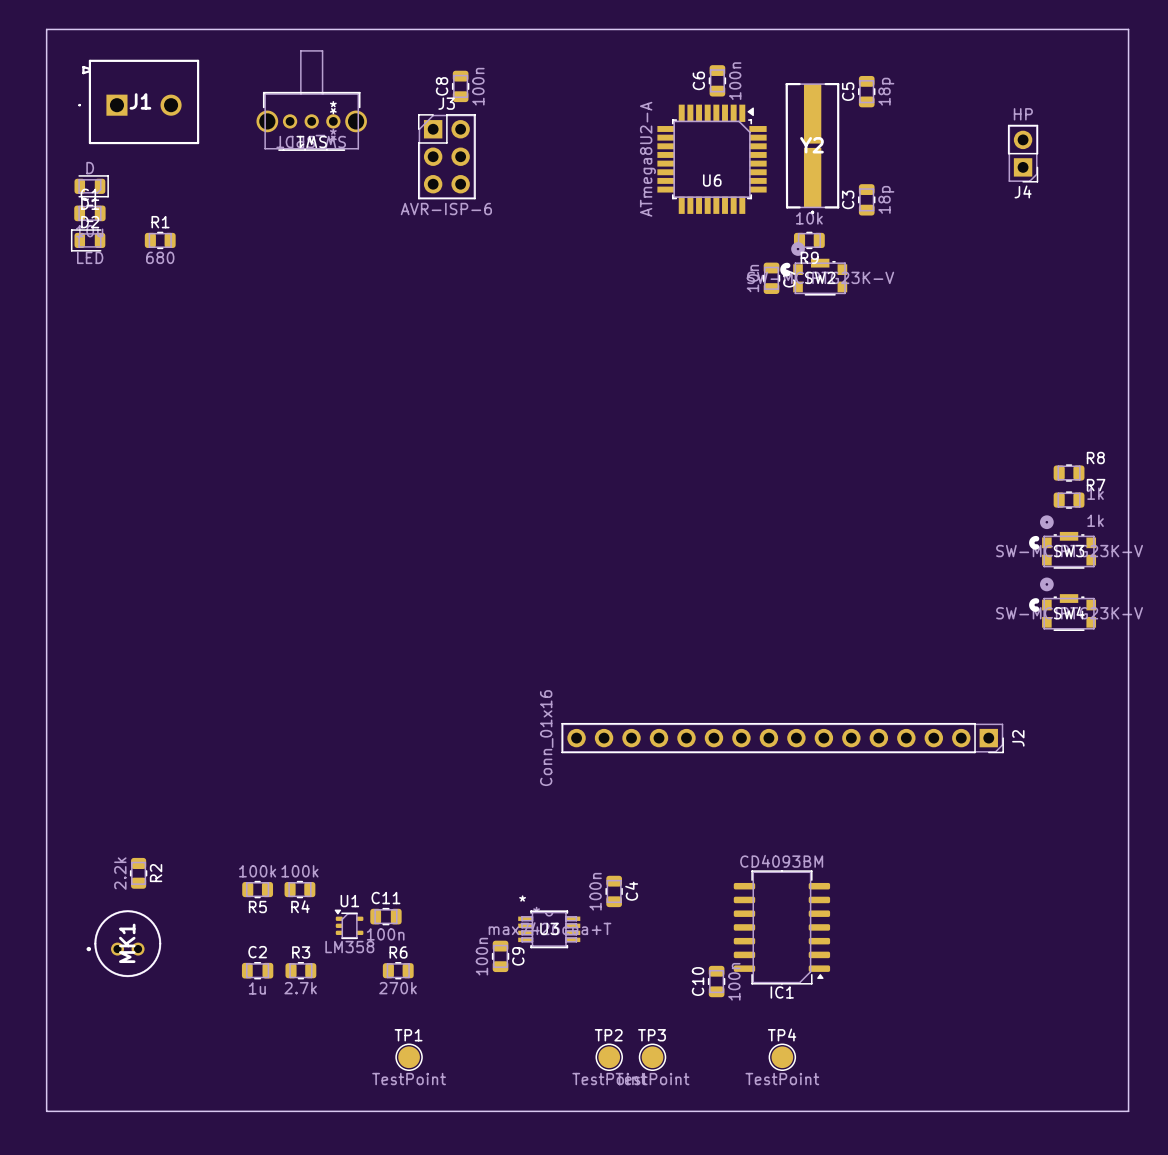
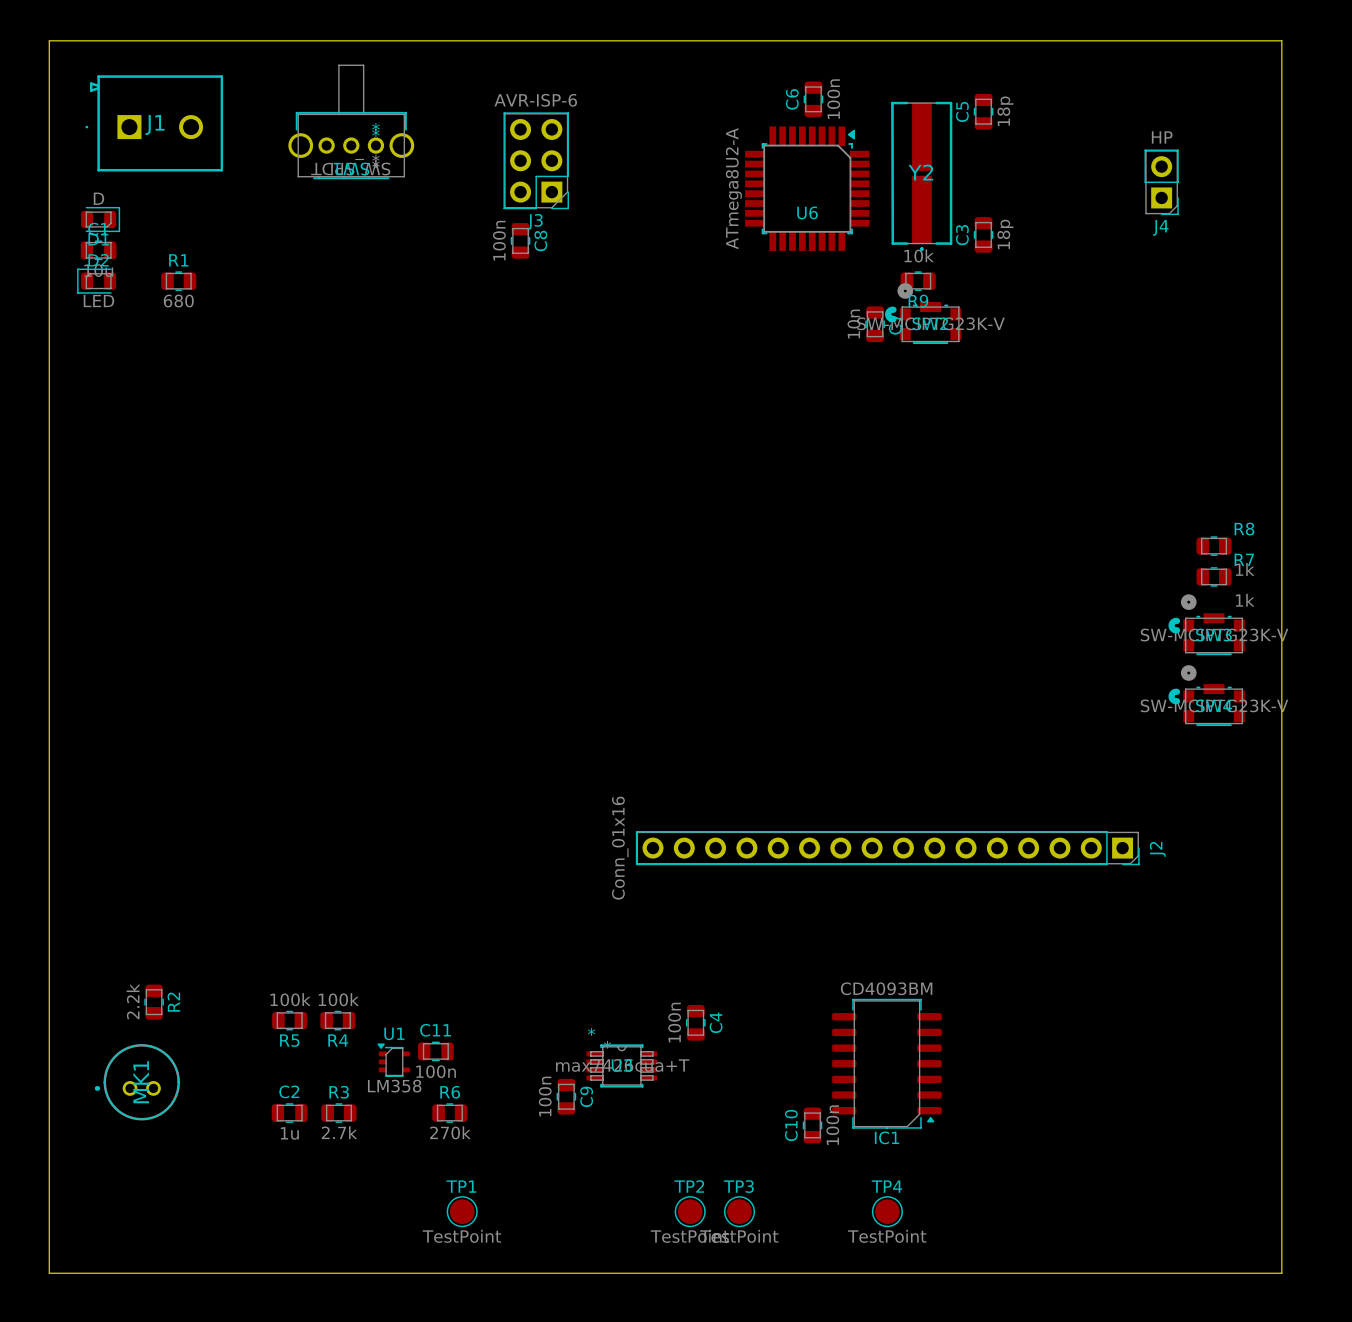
C8 name position: C8 (442, 86) -> C8 (540, 241)
C8 position: (460, 86) -> (520, 240)
C8 value position: 100n (478, 86) -> 100n (499, 240)
J3 rotation: 0° (446, 156) -> 180° (536, 160)

